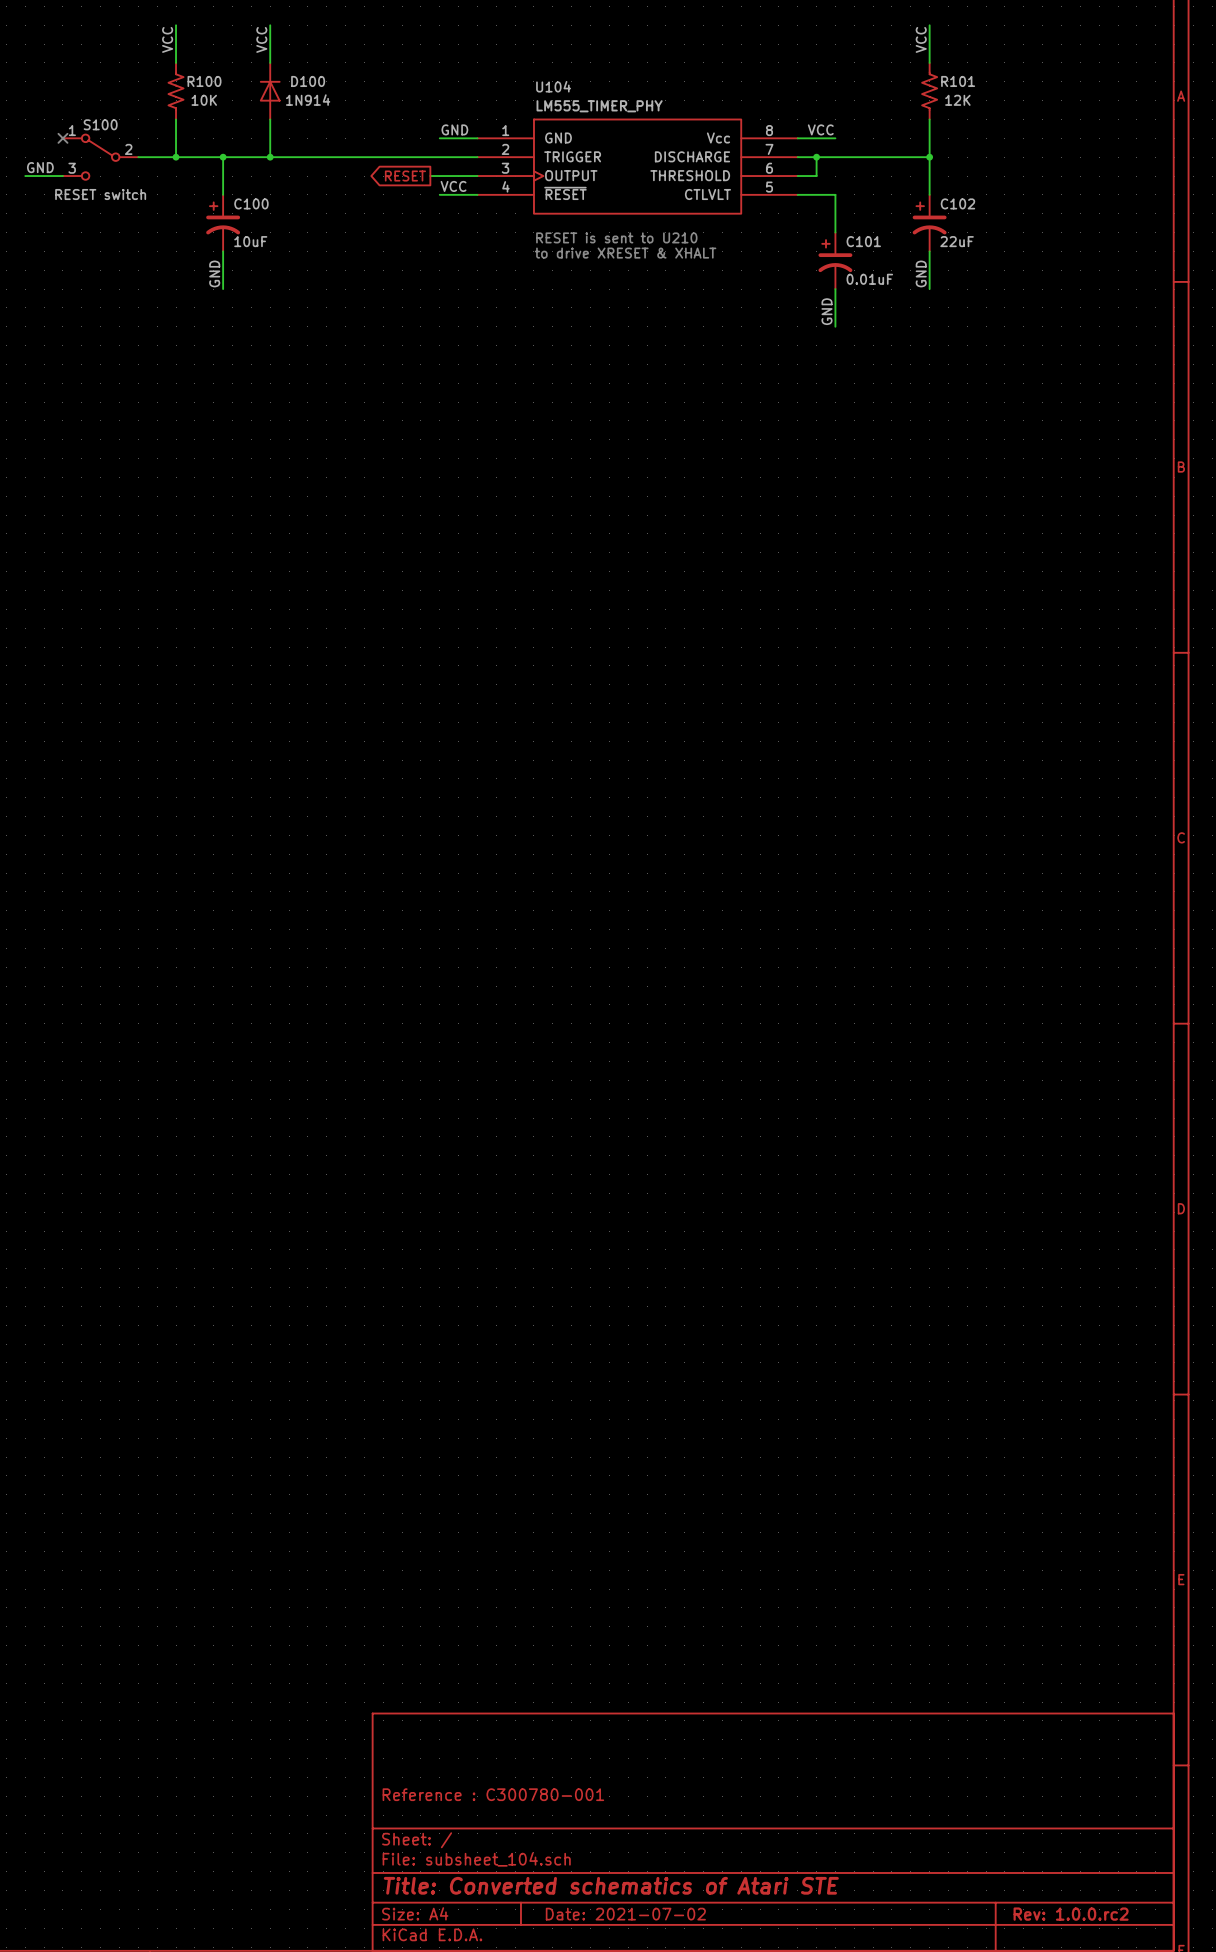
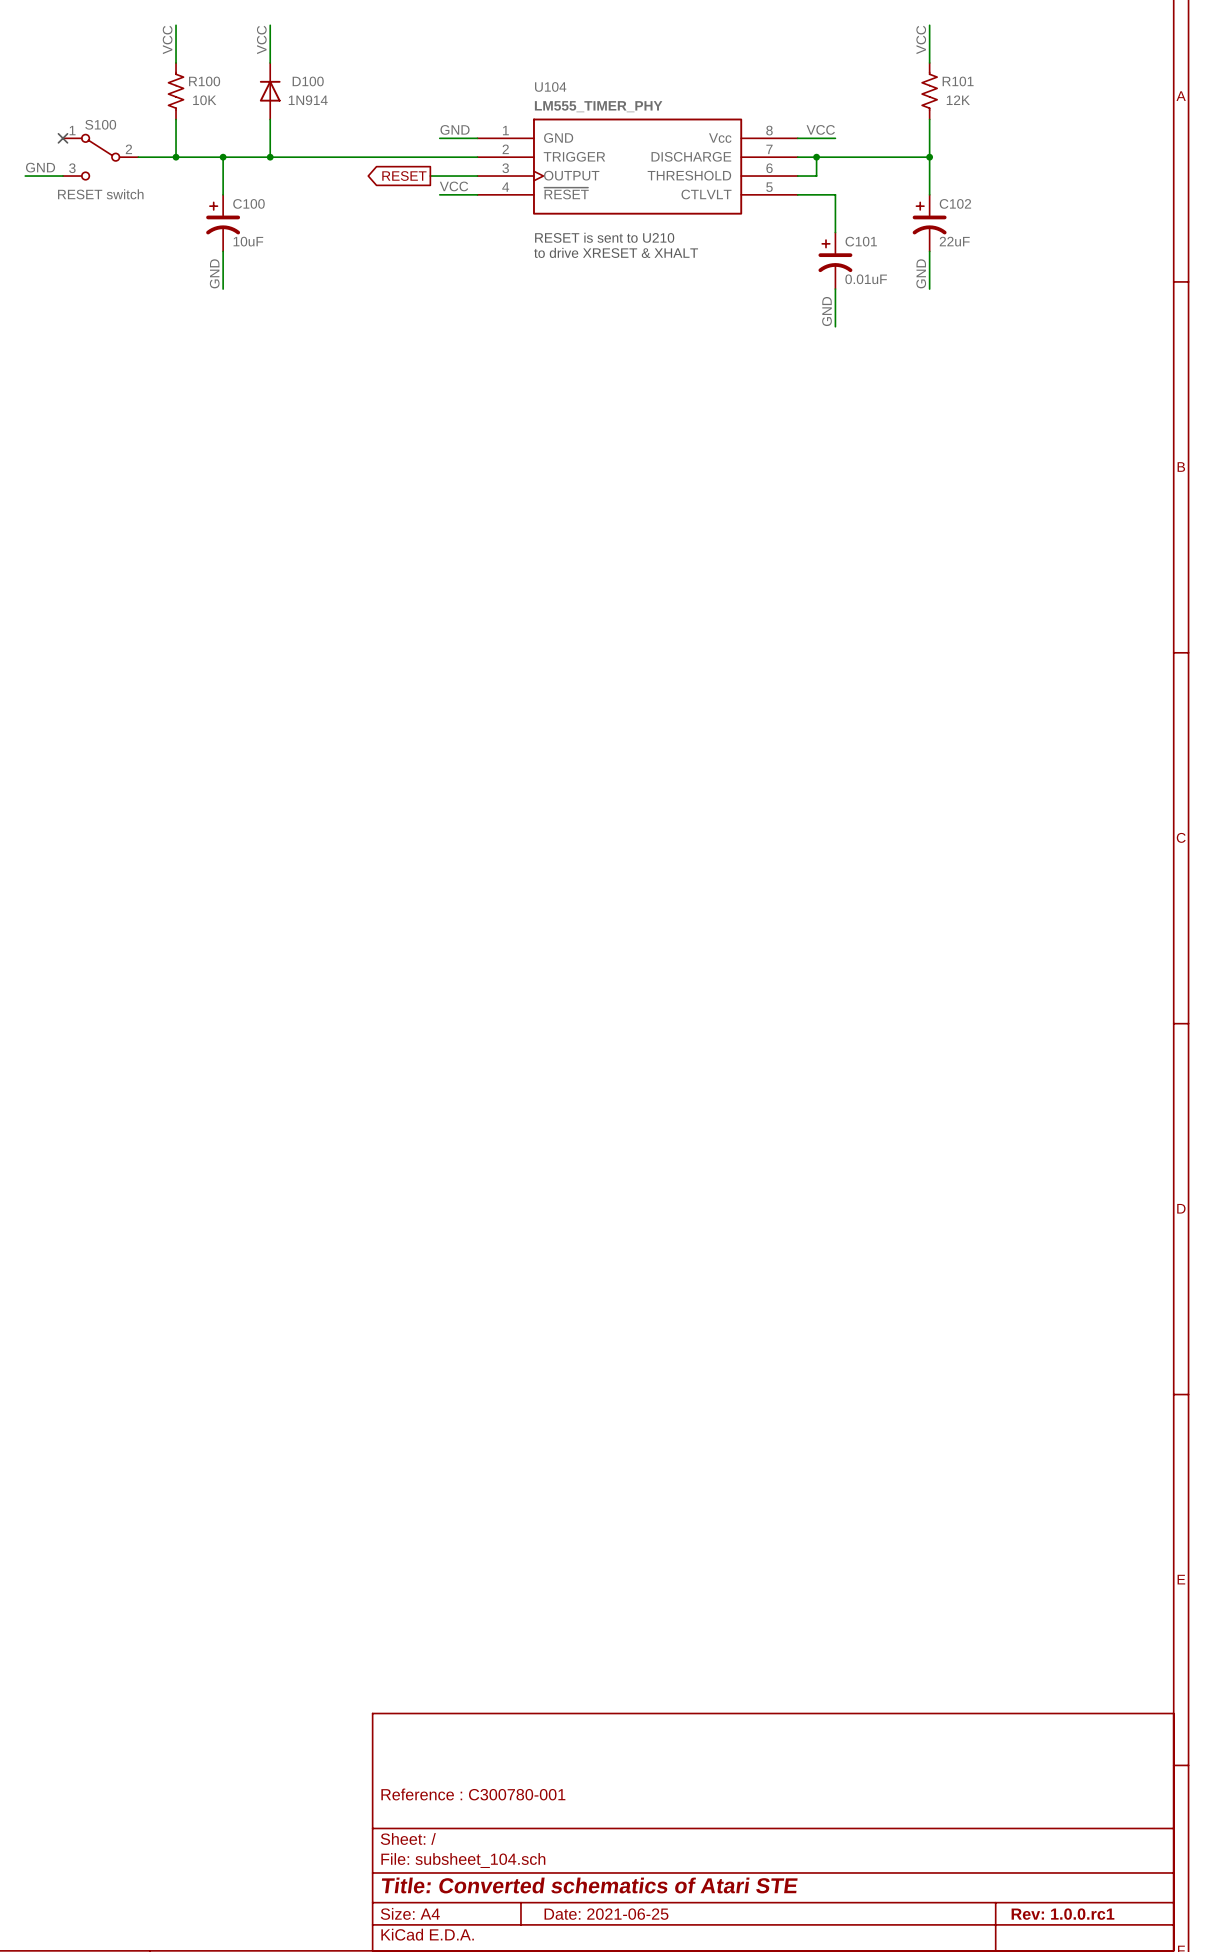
title block: Date: 2021-07-02 (625, 1914) -> Date: 2021-06-25 (606, 1914)
title block: Rev: 1.0.0.rc2 (1071, 1914) -> Rev: 1.0.0.rc1 (1062, 1914)

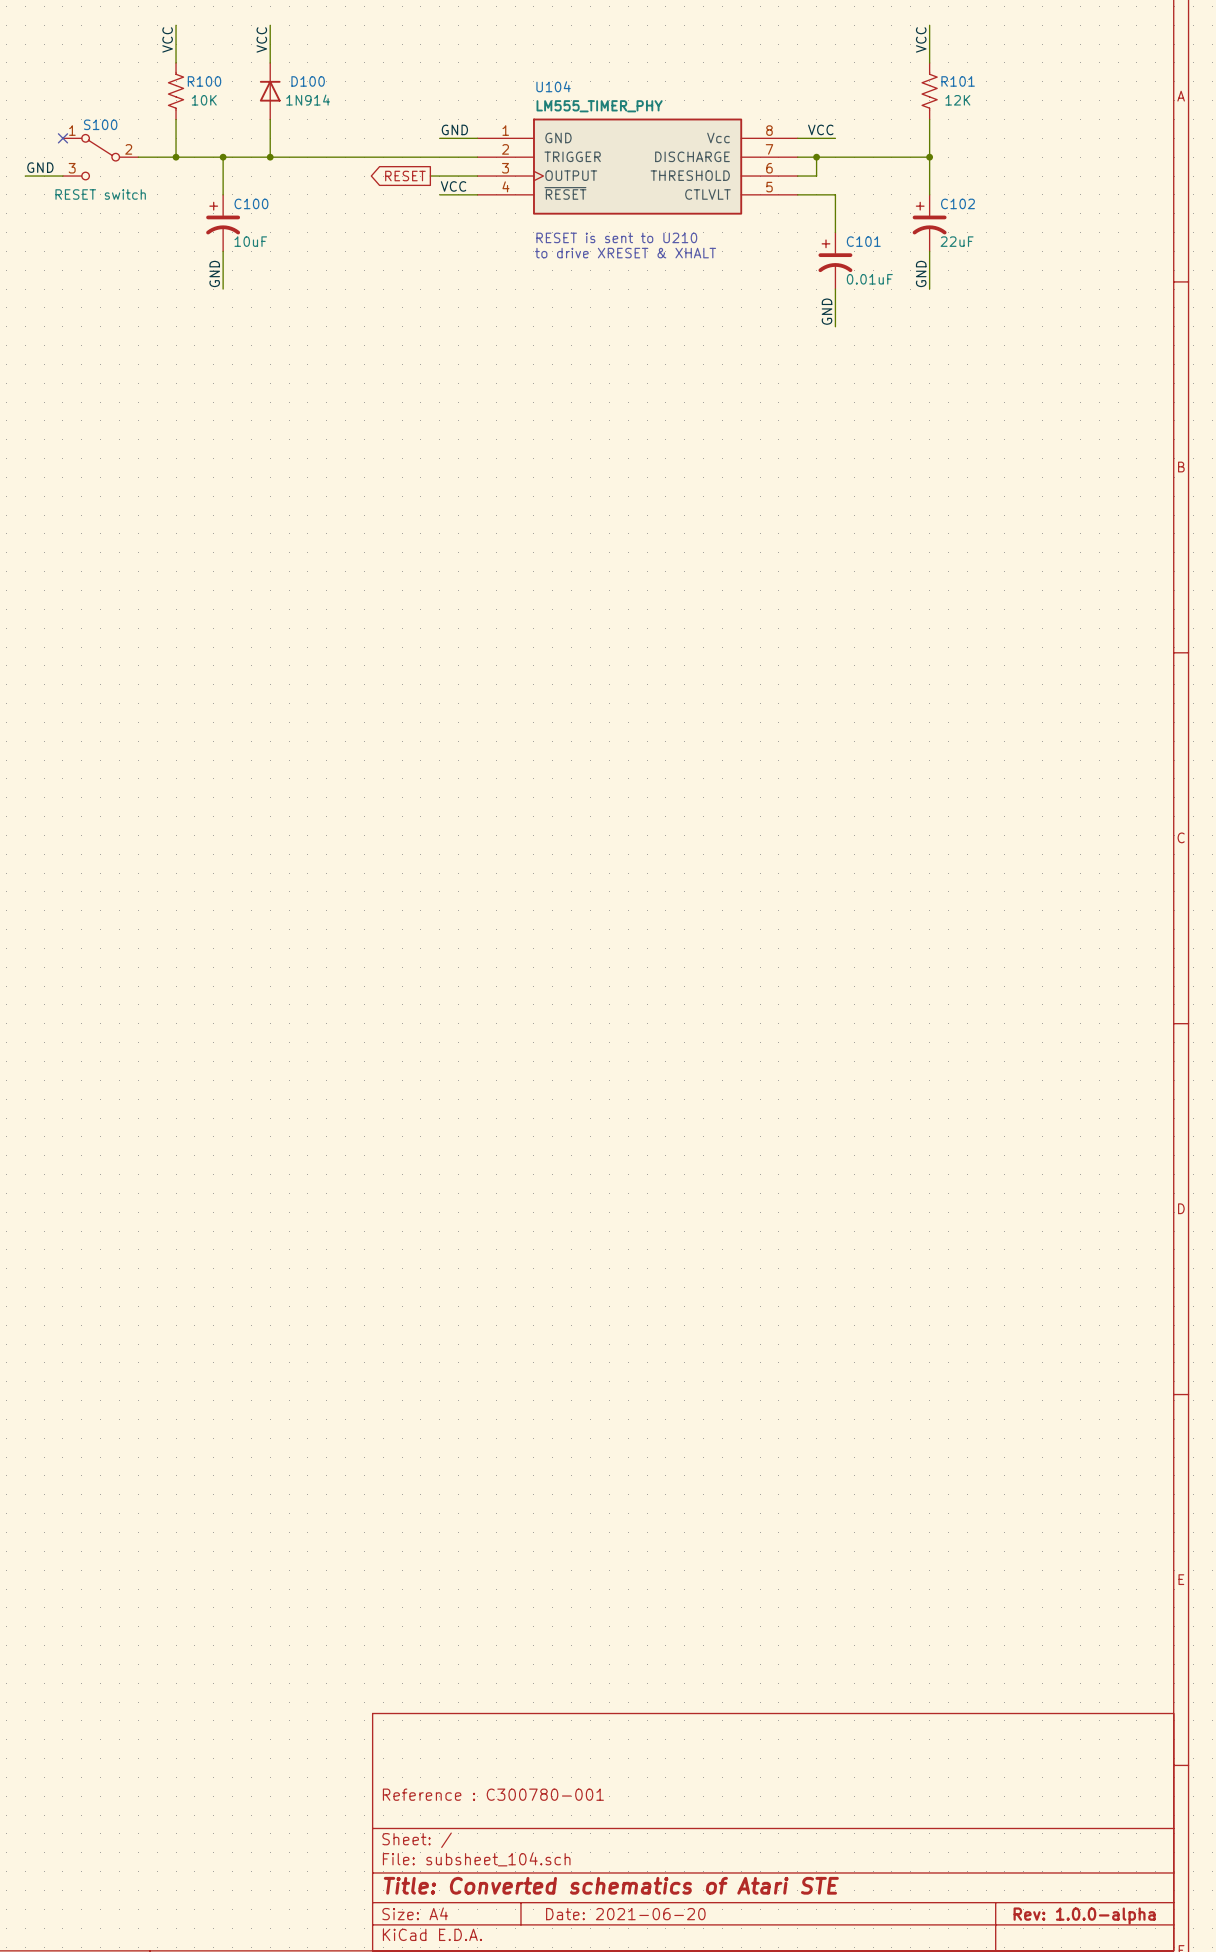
title block: Date: 2021-06-25 (606, 1914) -> Date: 2021-06-20 (625, 1914)
title block: Rev: 1.0.0.rc1 (1062, 1914) -> Rev: 1.0.0-alpha (1084, 1915)

